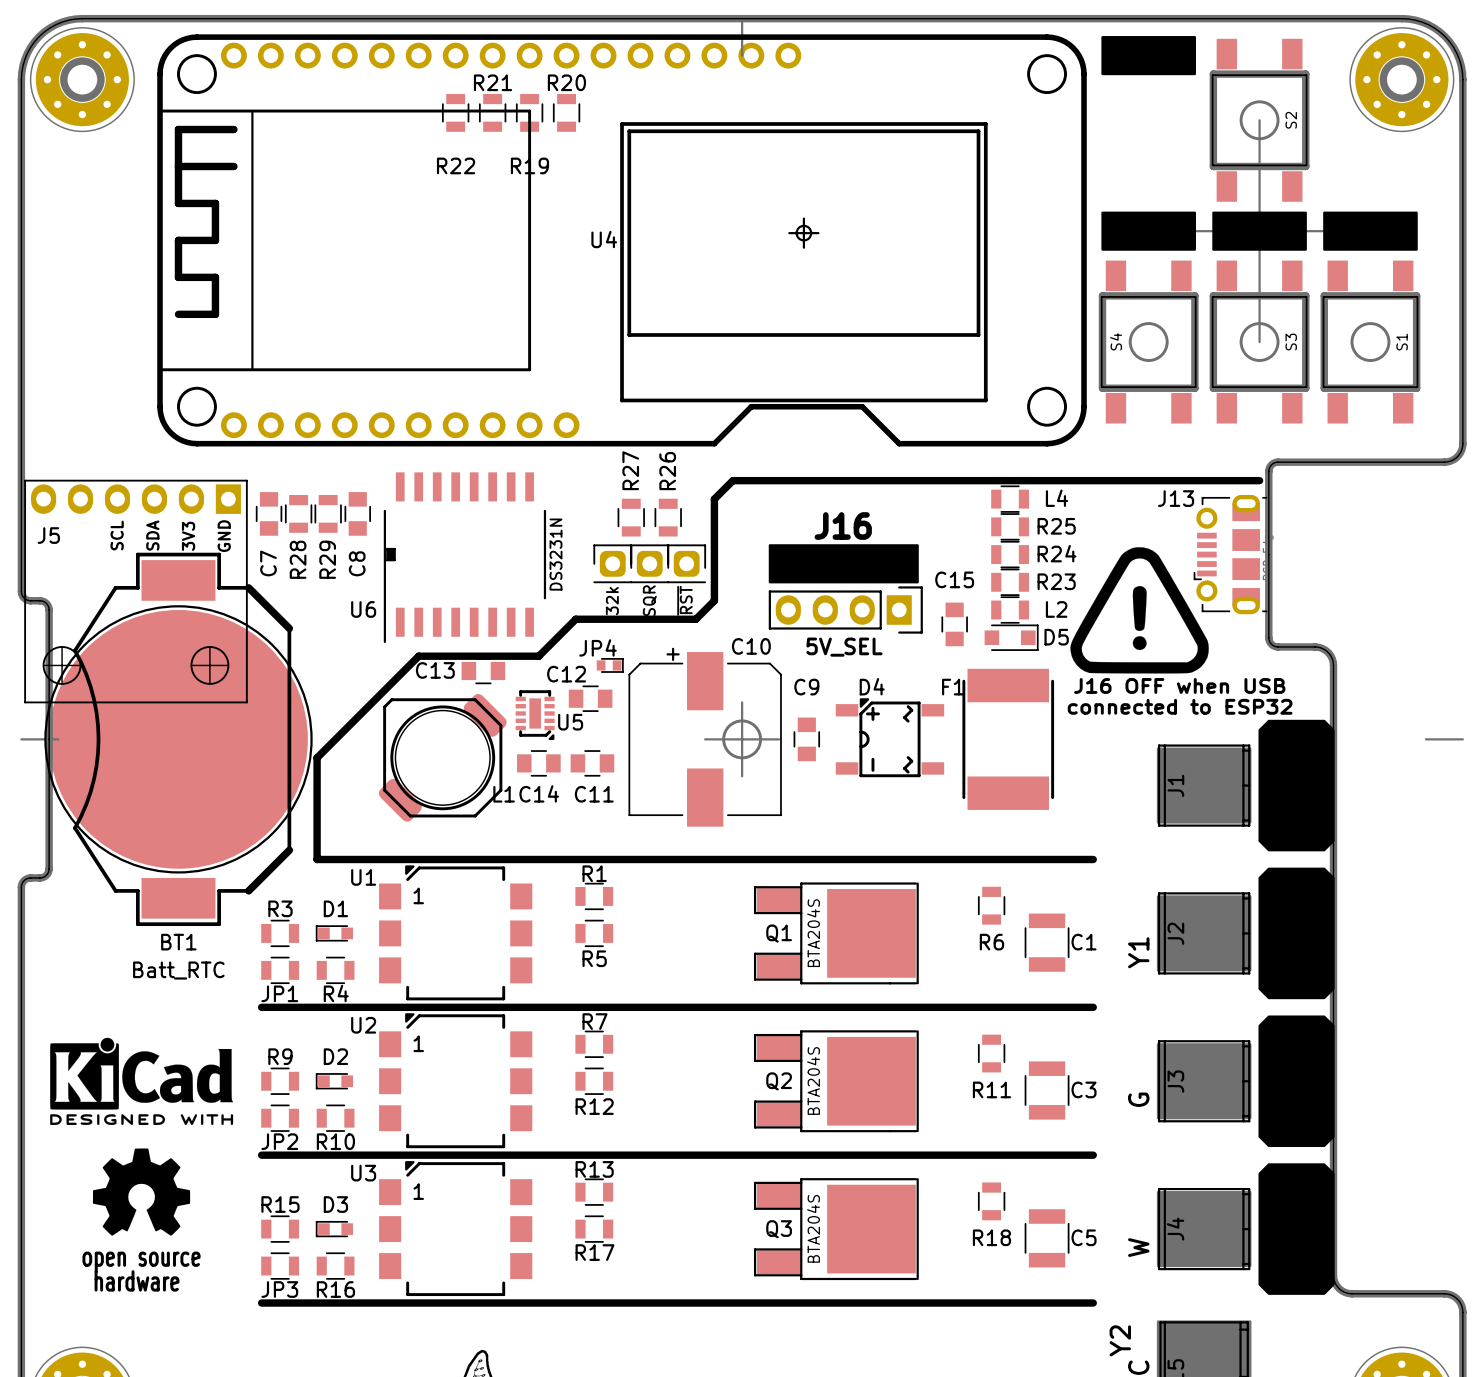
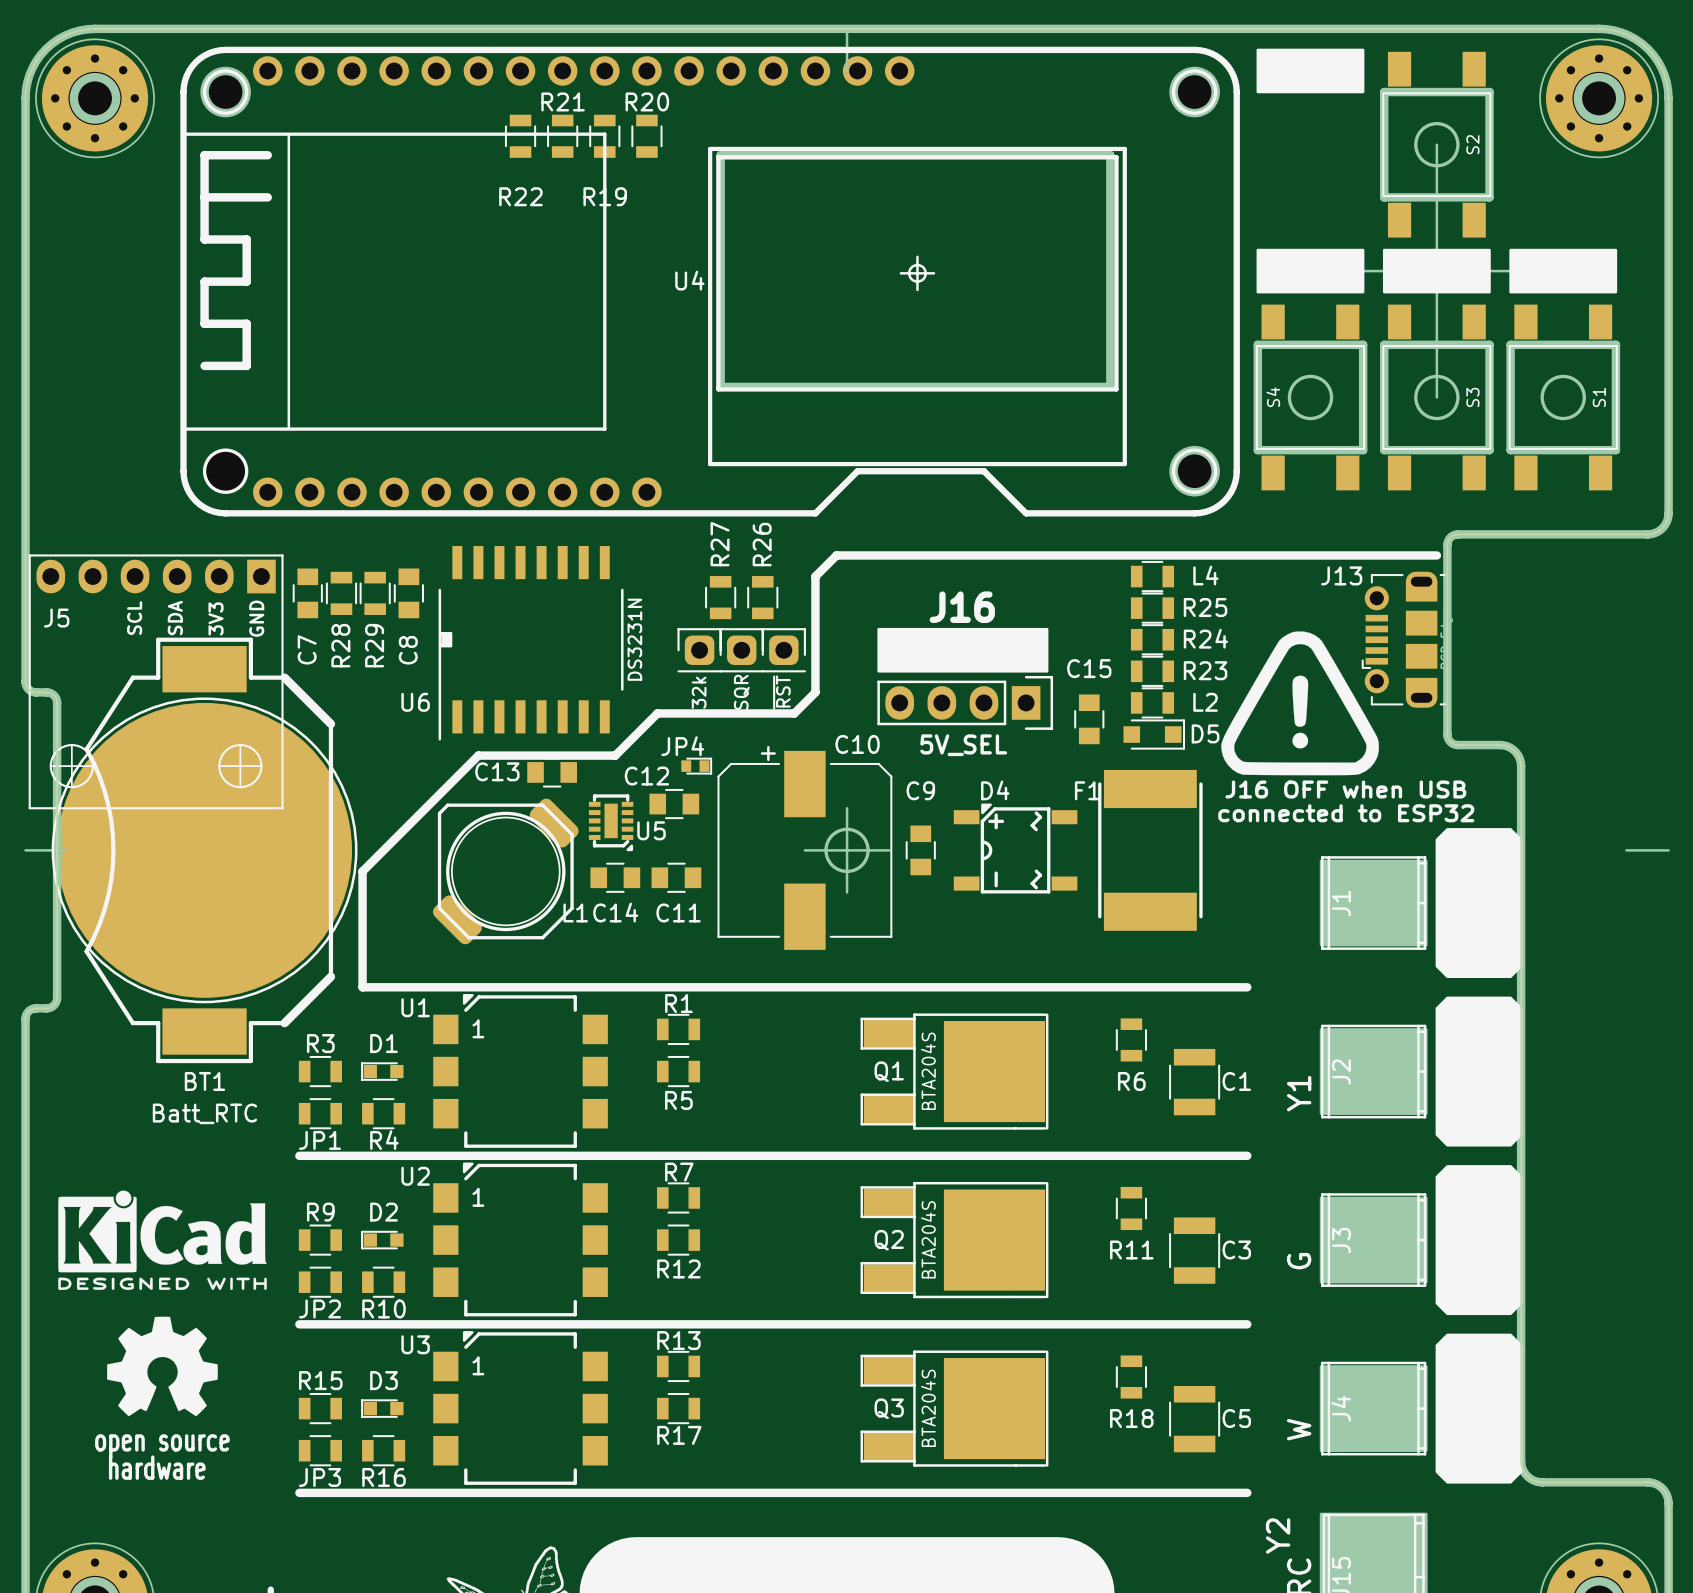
drawing: none -> [200, 66, 251, 118]
drawing: none -> [1169, 66, 1220, 118]
line: none -> (720, 155) (720, 386) (1110, 386) (1110, 155) (720, 155)
drawing: none -> [1169, 445, 1220, 497]

